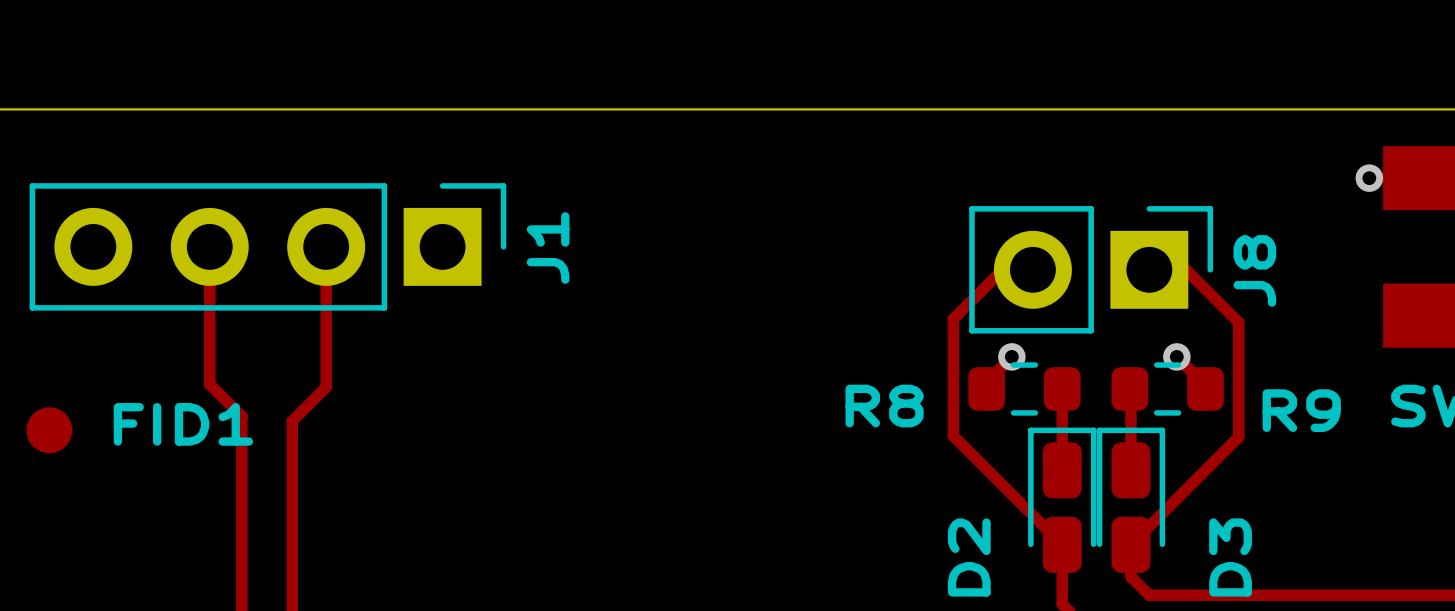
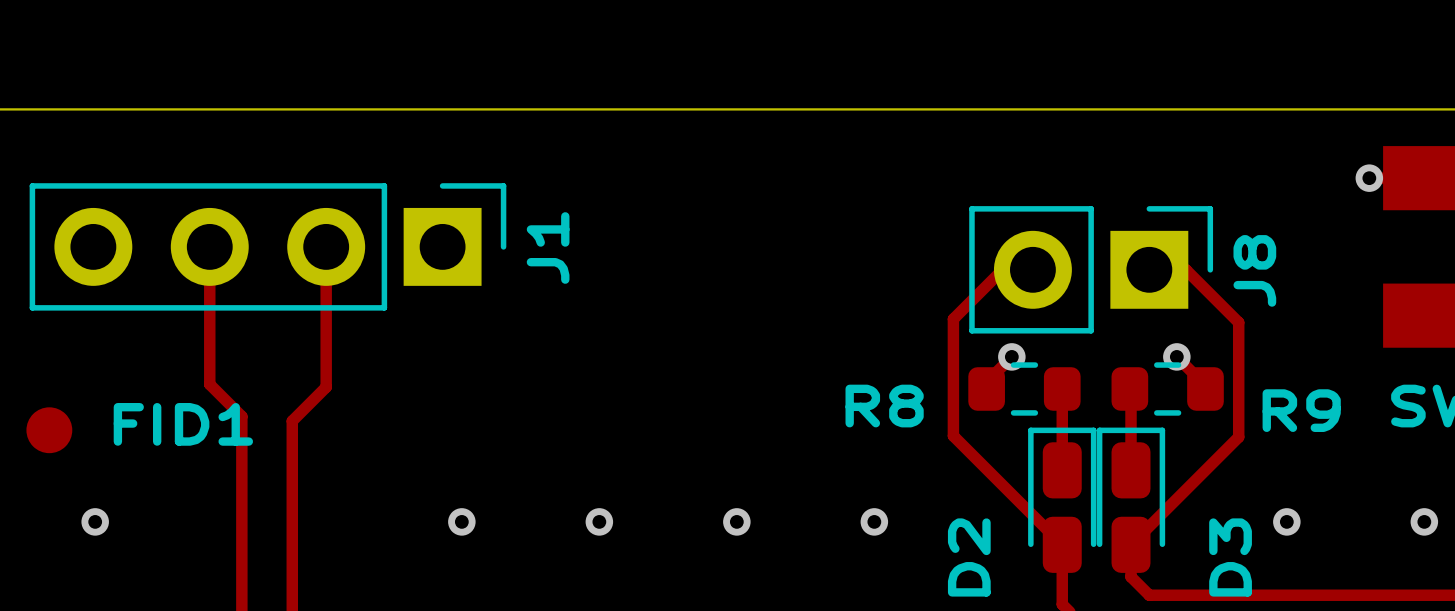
via: none -> (95, 521)
via: none -> (461, 521)
via: none -> (599, 521)
via: none -> (736, 521)
via: none -> (874, 521)
via: none -> (1286, 521)
via: none -> (1424, 521)

